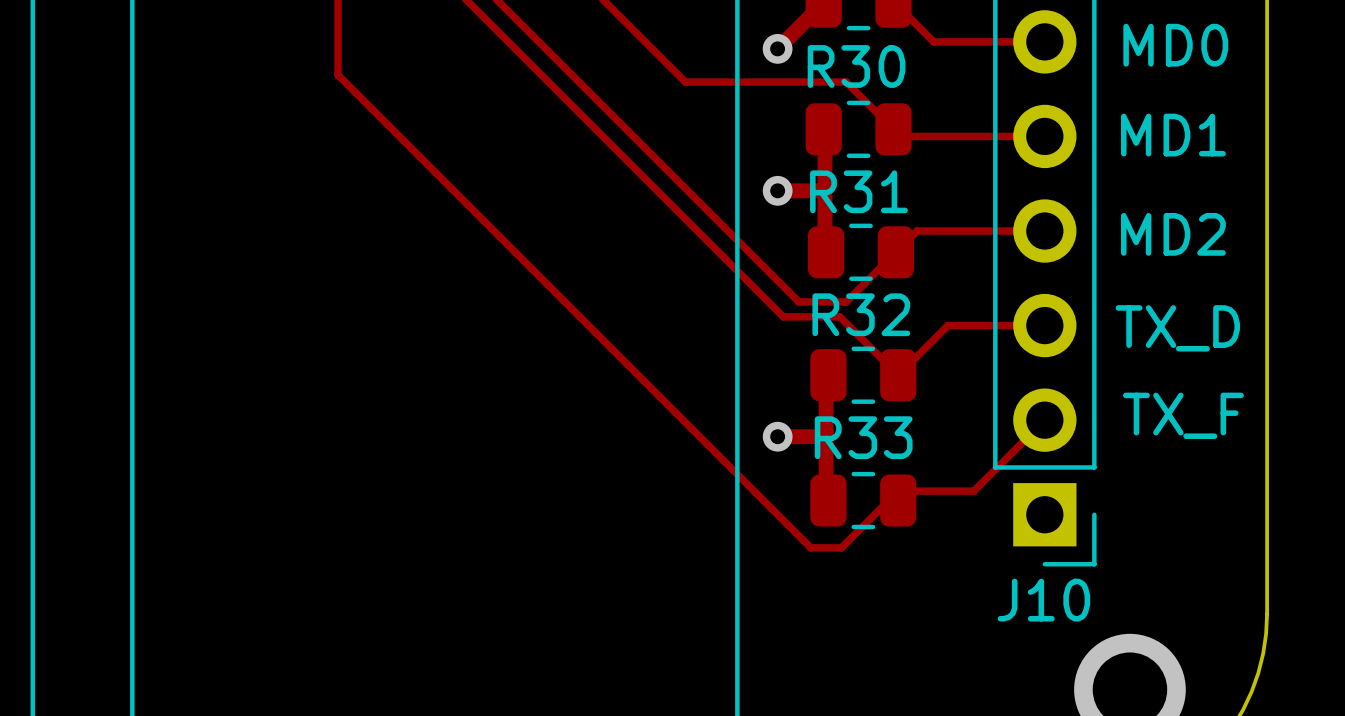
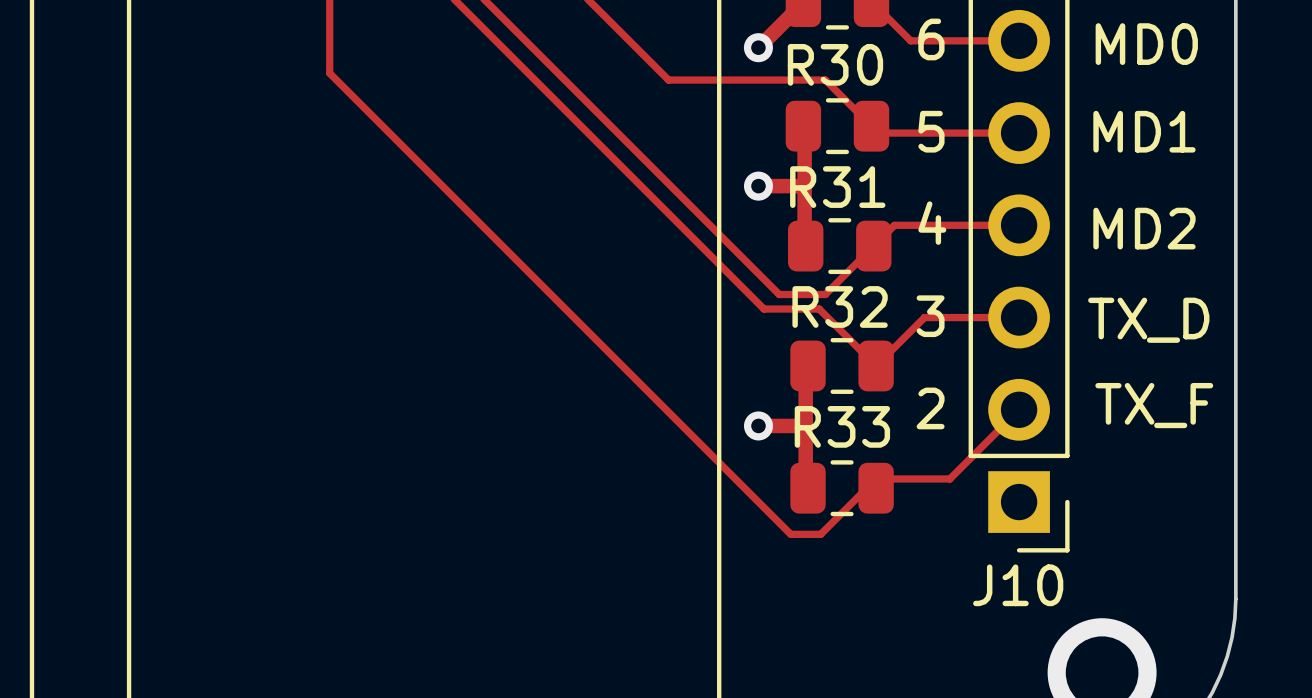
text: none -> 6 (931, 39)
text: none -> 5 (931, 131)
text: none -> 4 (932, 223)
text: none -> 3 (930, 316)
text: none -> 2 (930, 408)

